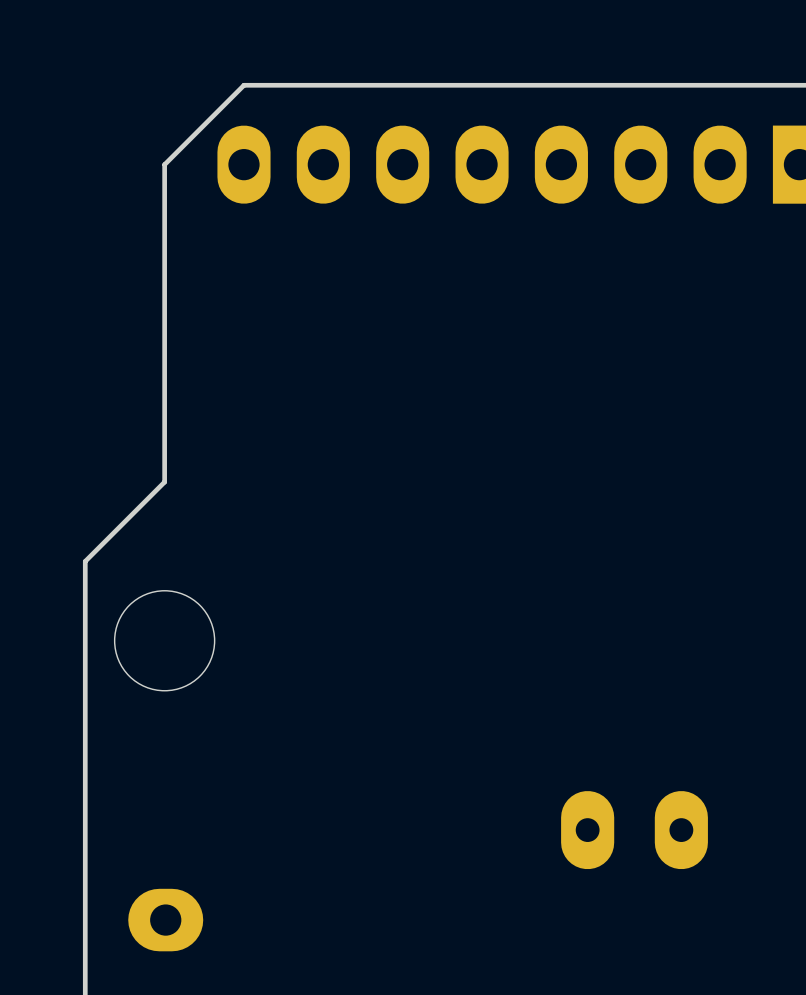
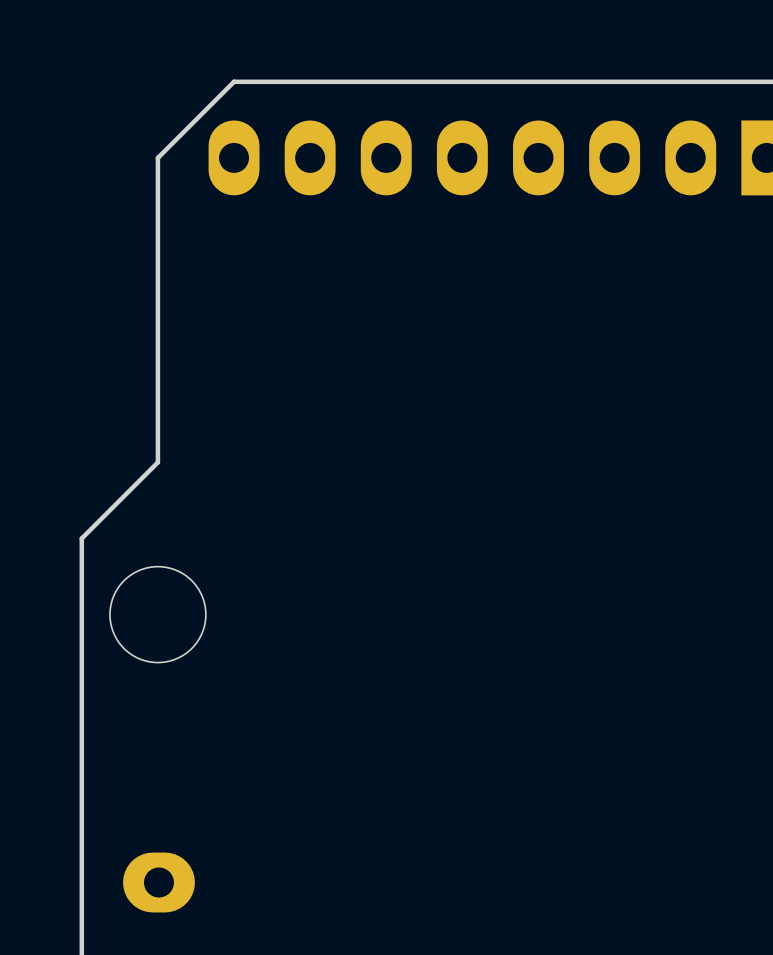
part: (634, 830) -> none

